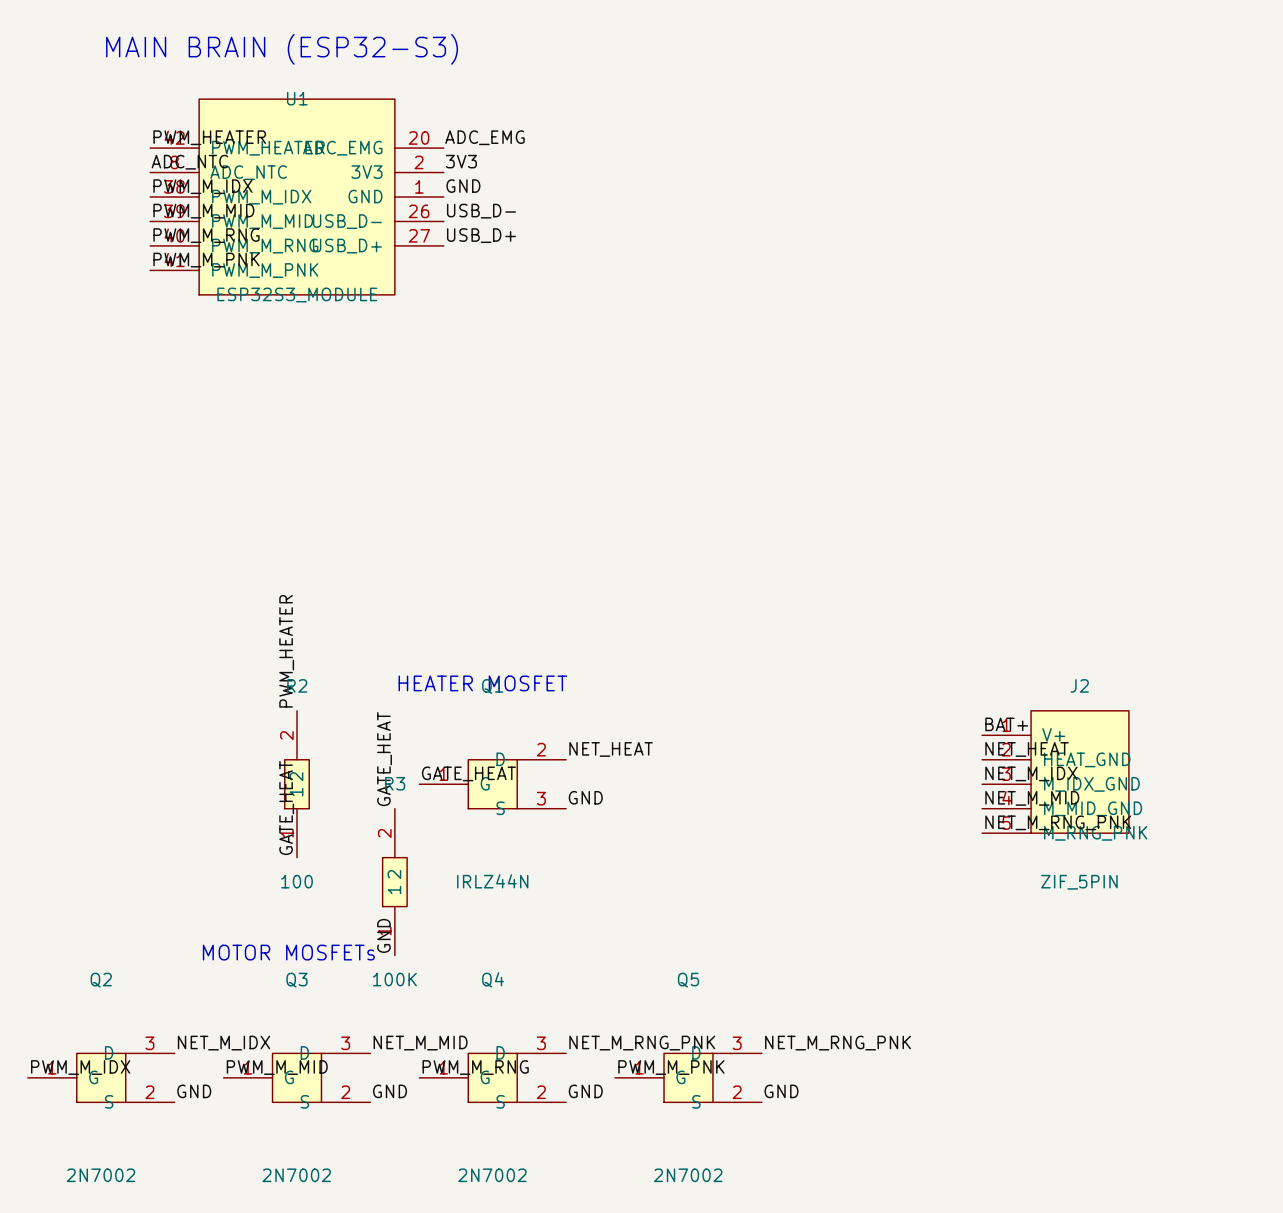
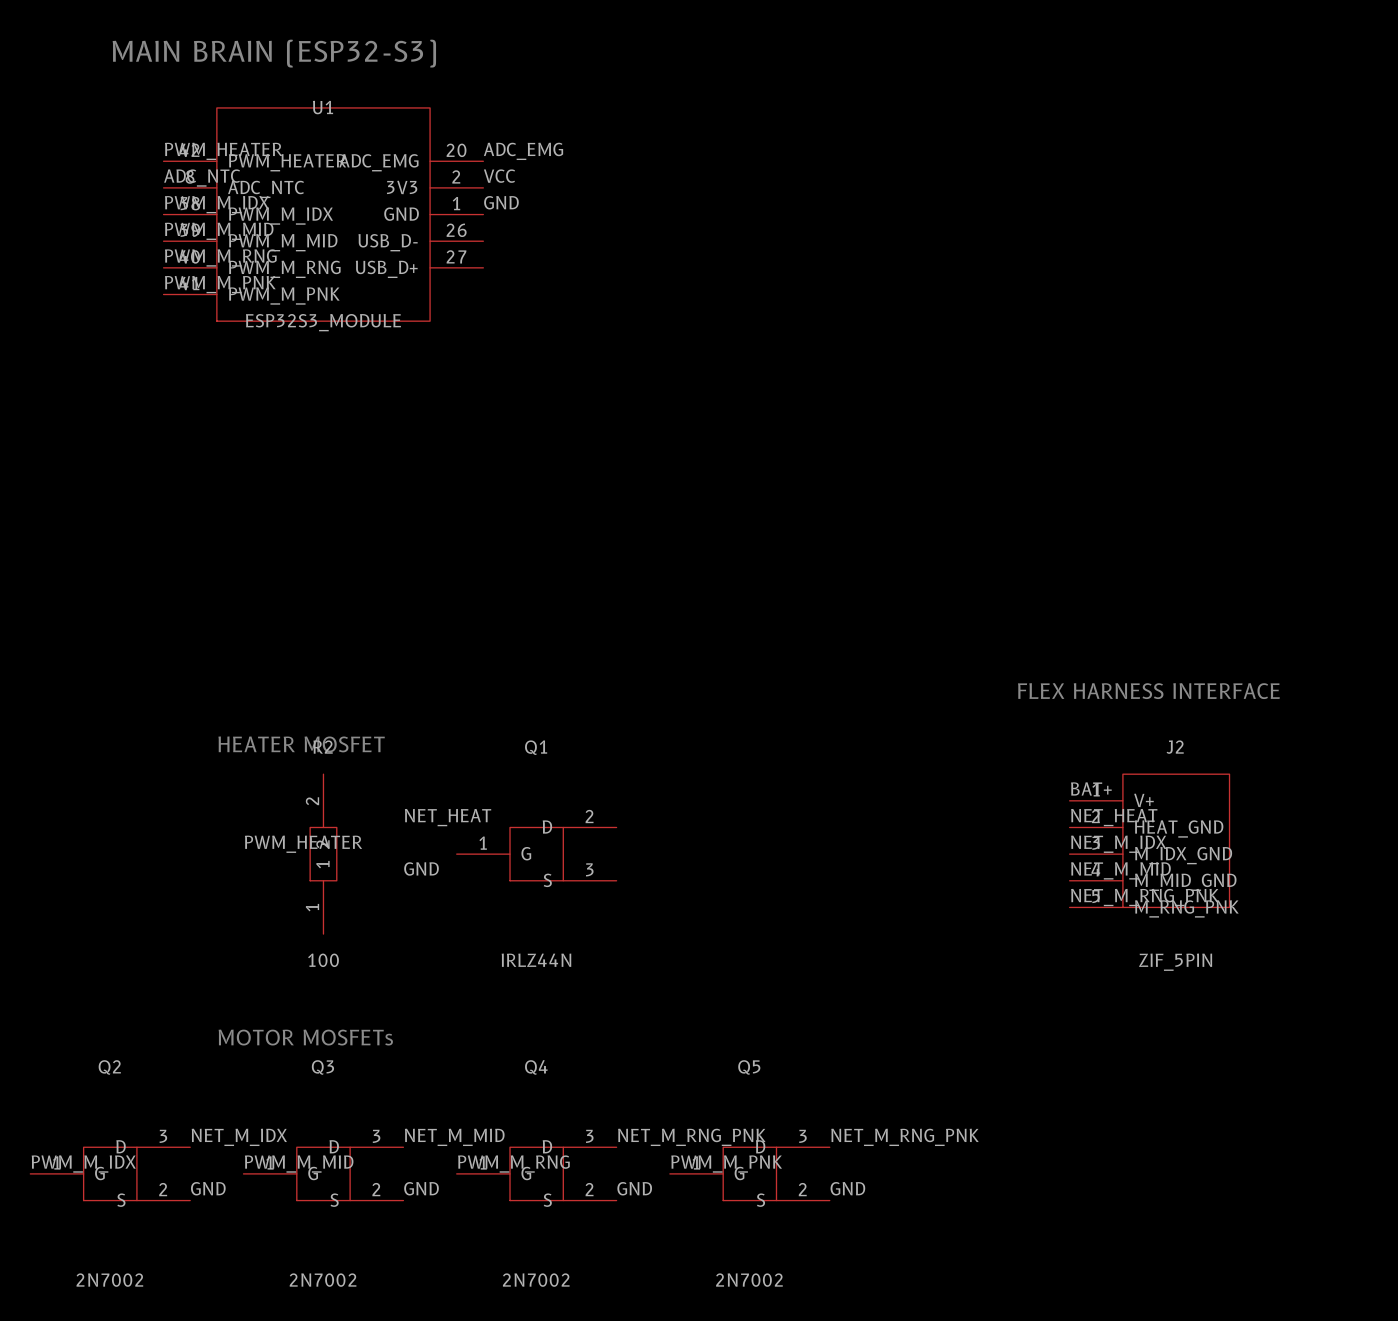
label: 3V3 (461, 161) -> VCC (499, 176)
label: USB_D- (481, 211) -> none
label: USB_D+ (481, 235) -> none
text: none -> FLEX HARNESS INTERFACE (1148, 691)
label rotation: 0° (286, 651) -> 90° clockwise (303, 844)
text position: HEATER MOSFET (482, 683) -> HEATER MOSFET (301, 744)
label position: NET_HEAT (611, 749) -> NET_HEAT (448, 817)
label: GATE_HEAT (384, 759) -> none
label: GATE_HEAT (468, 773) -> none
label: none -> GND (421, 868)
label: GND (585, 797) -> none
label: GATE_HEAT (286, 808) -> none
R3: 100K (394, 882) -> none
label: GND (383, 935) -> none

